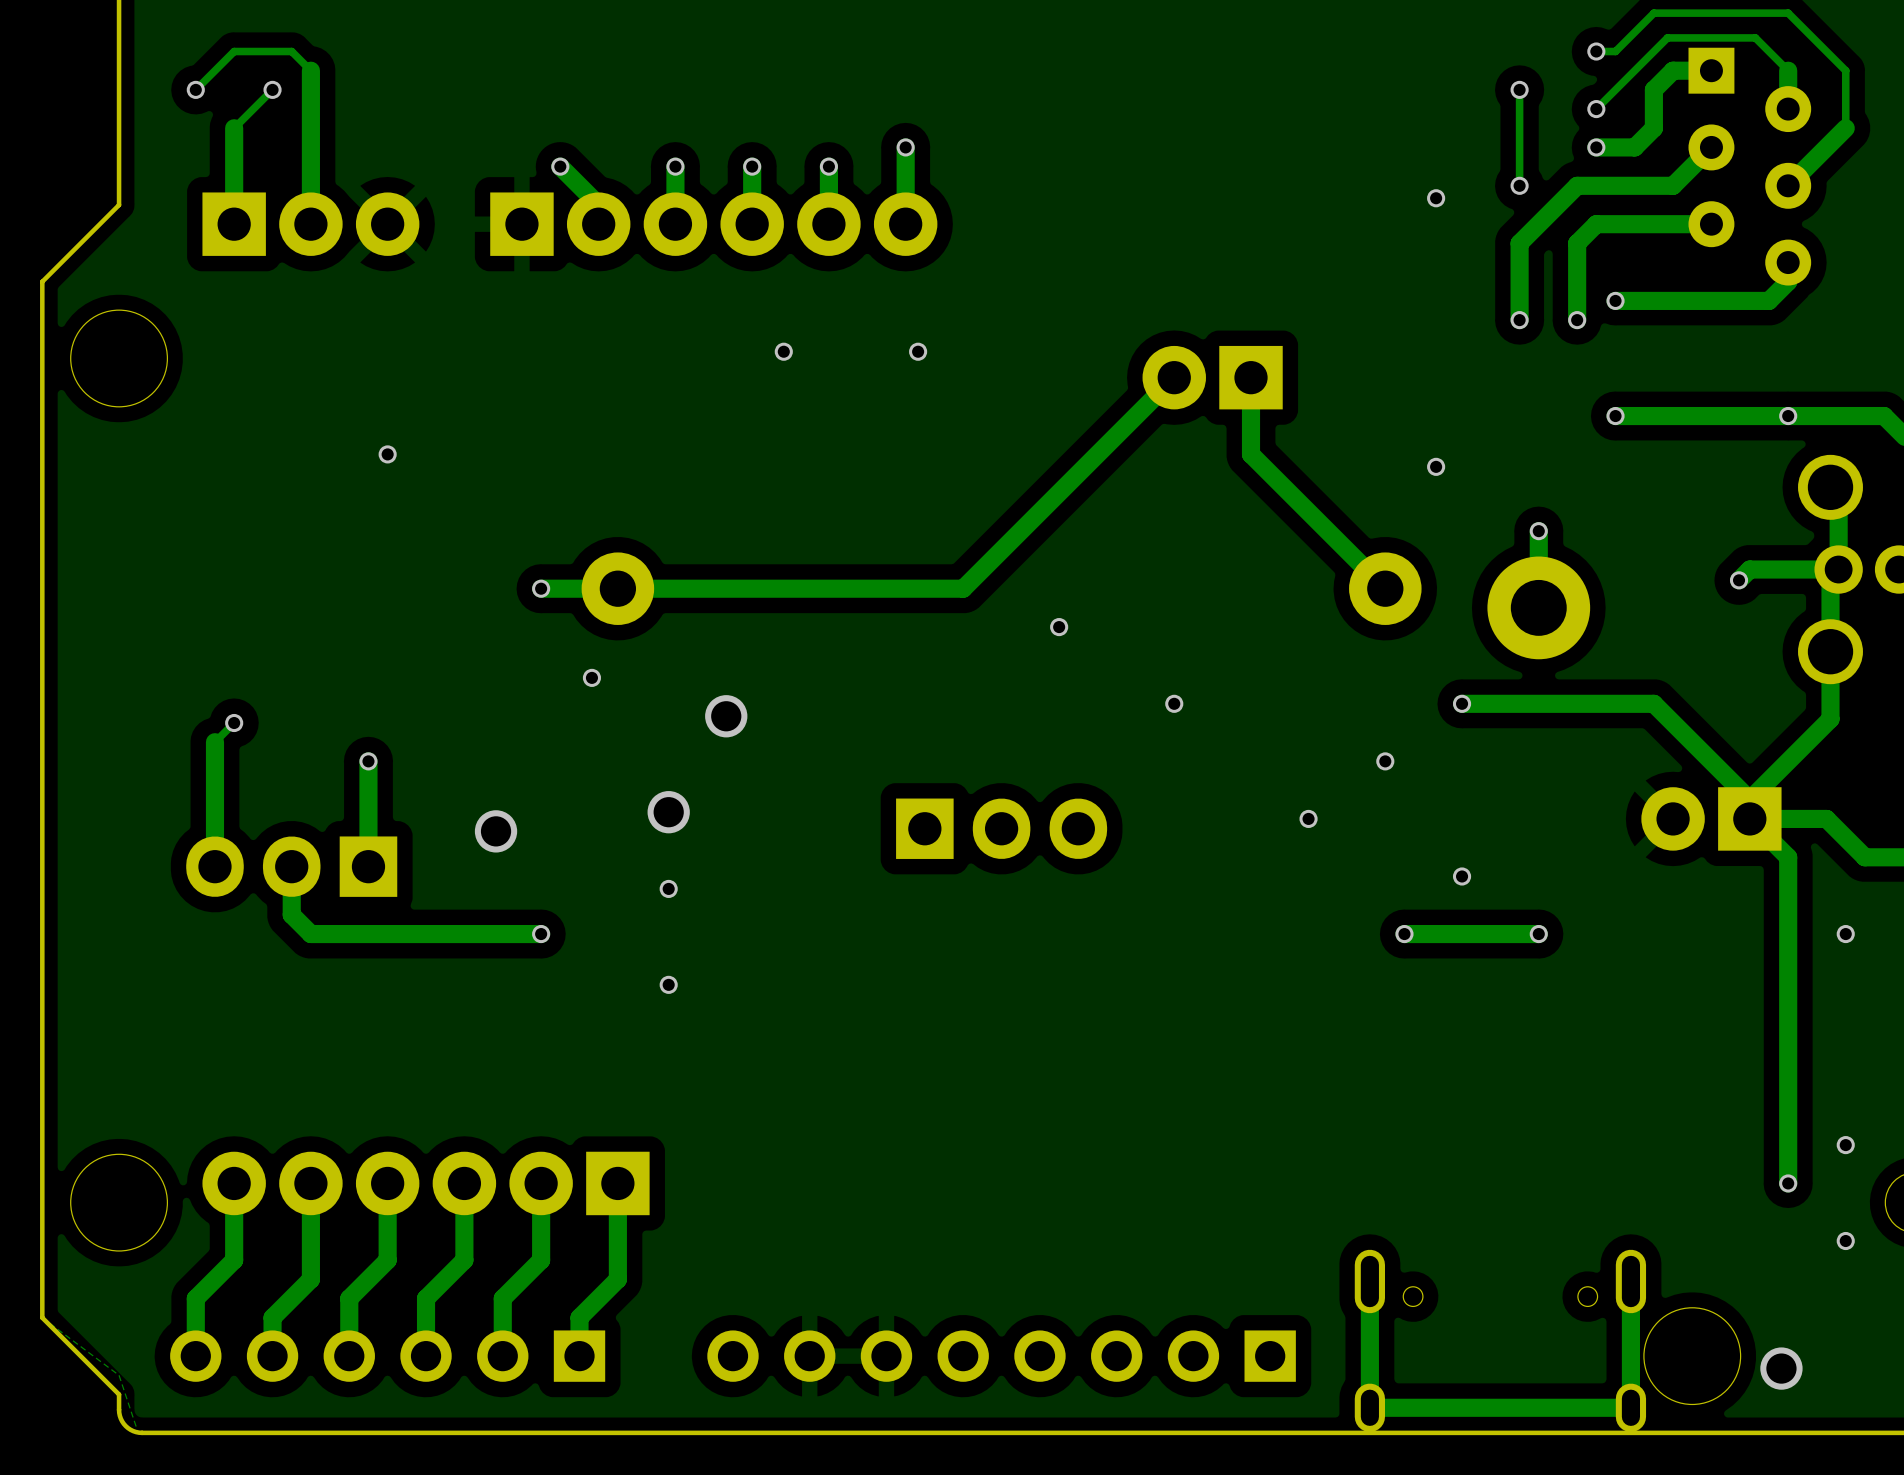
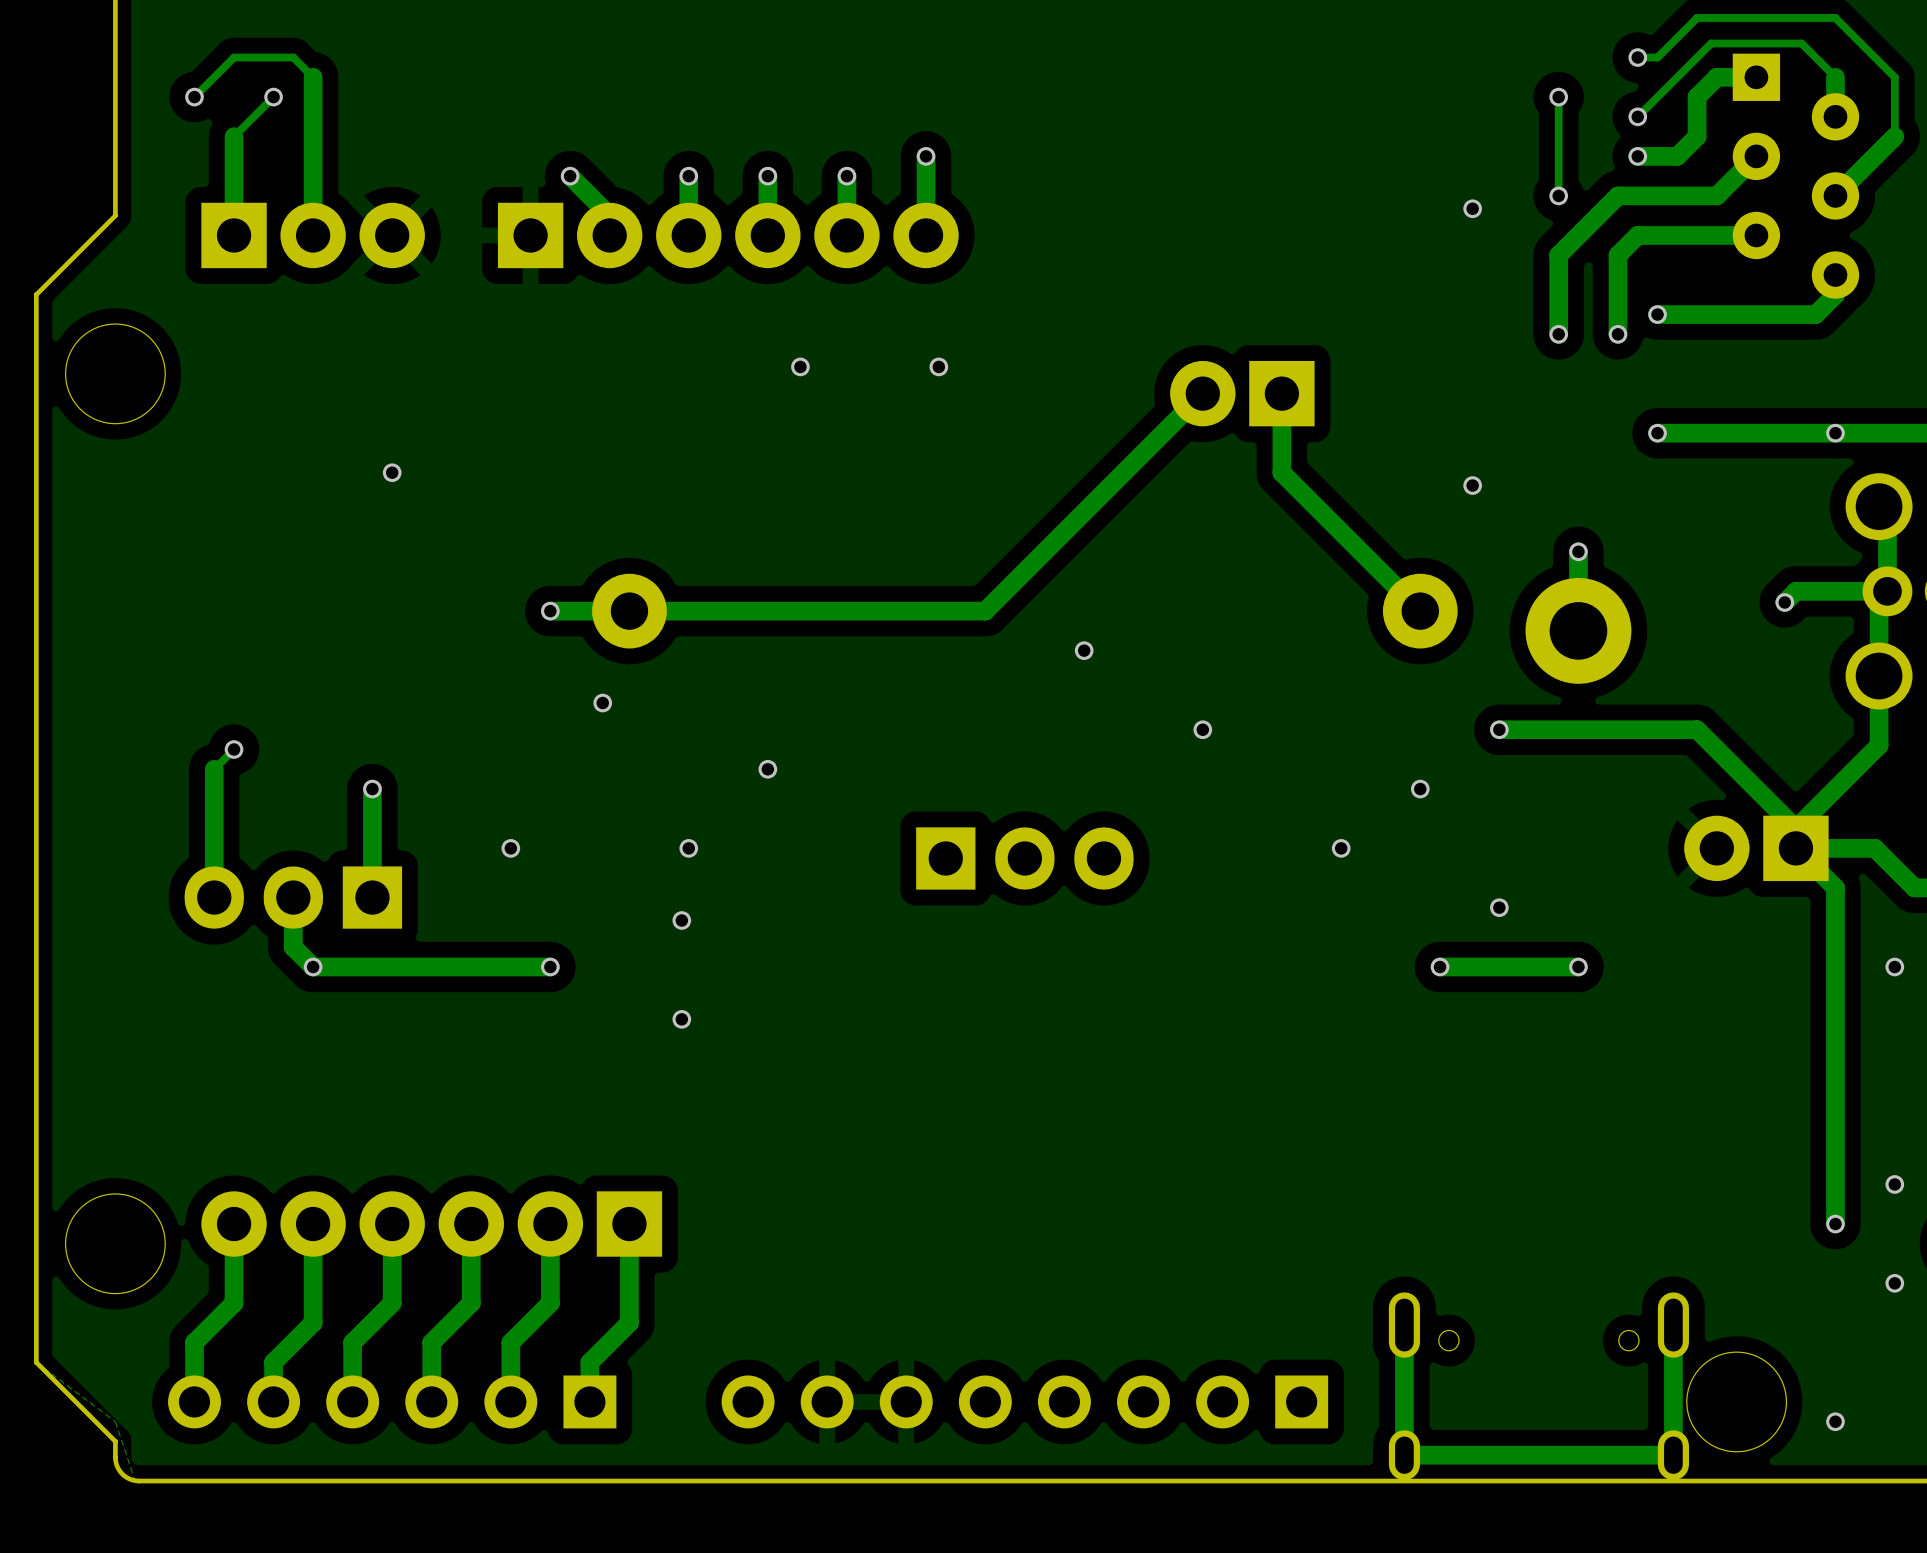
via: (726, 716) -> none
via: none -> (767, 769)
via size: [647, 791, 690, 834] -> [679, 839, 699, 858]
via size: [474, 810, 518, 853] -> [501, 839, 521, 858]
via: none -> (313, 966)
via size: [1760, 1347, 1803, 1390] -> [1826, 1412, 1845, 1432]

